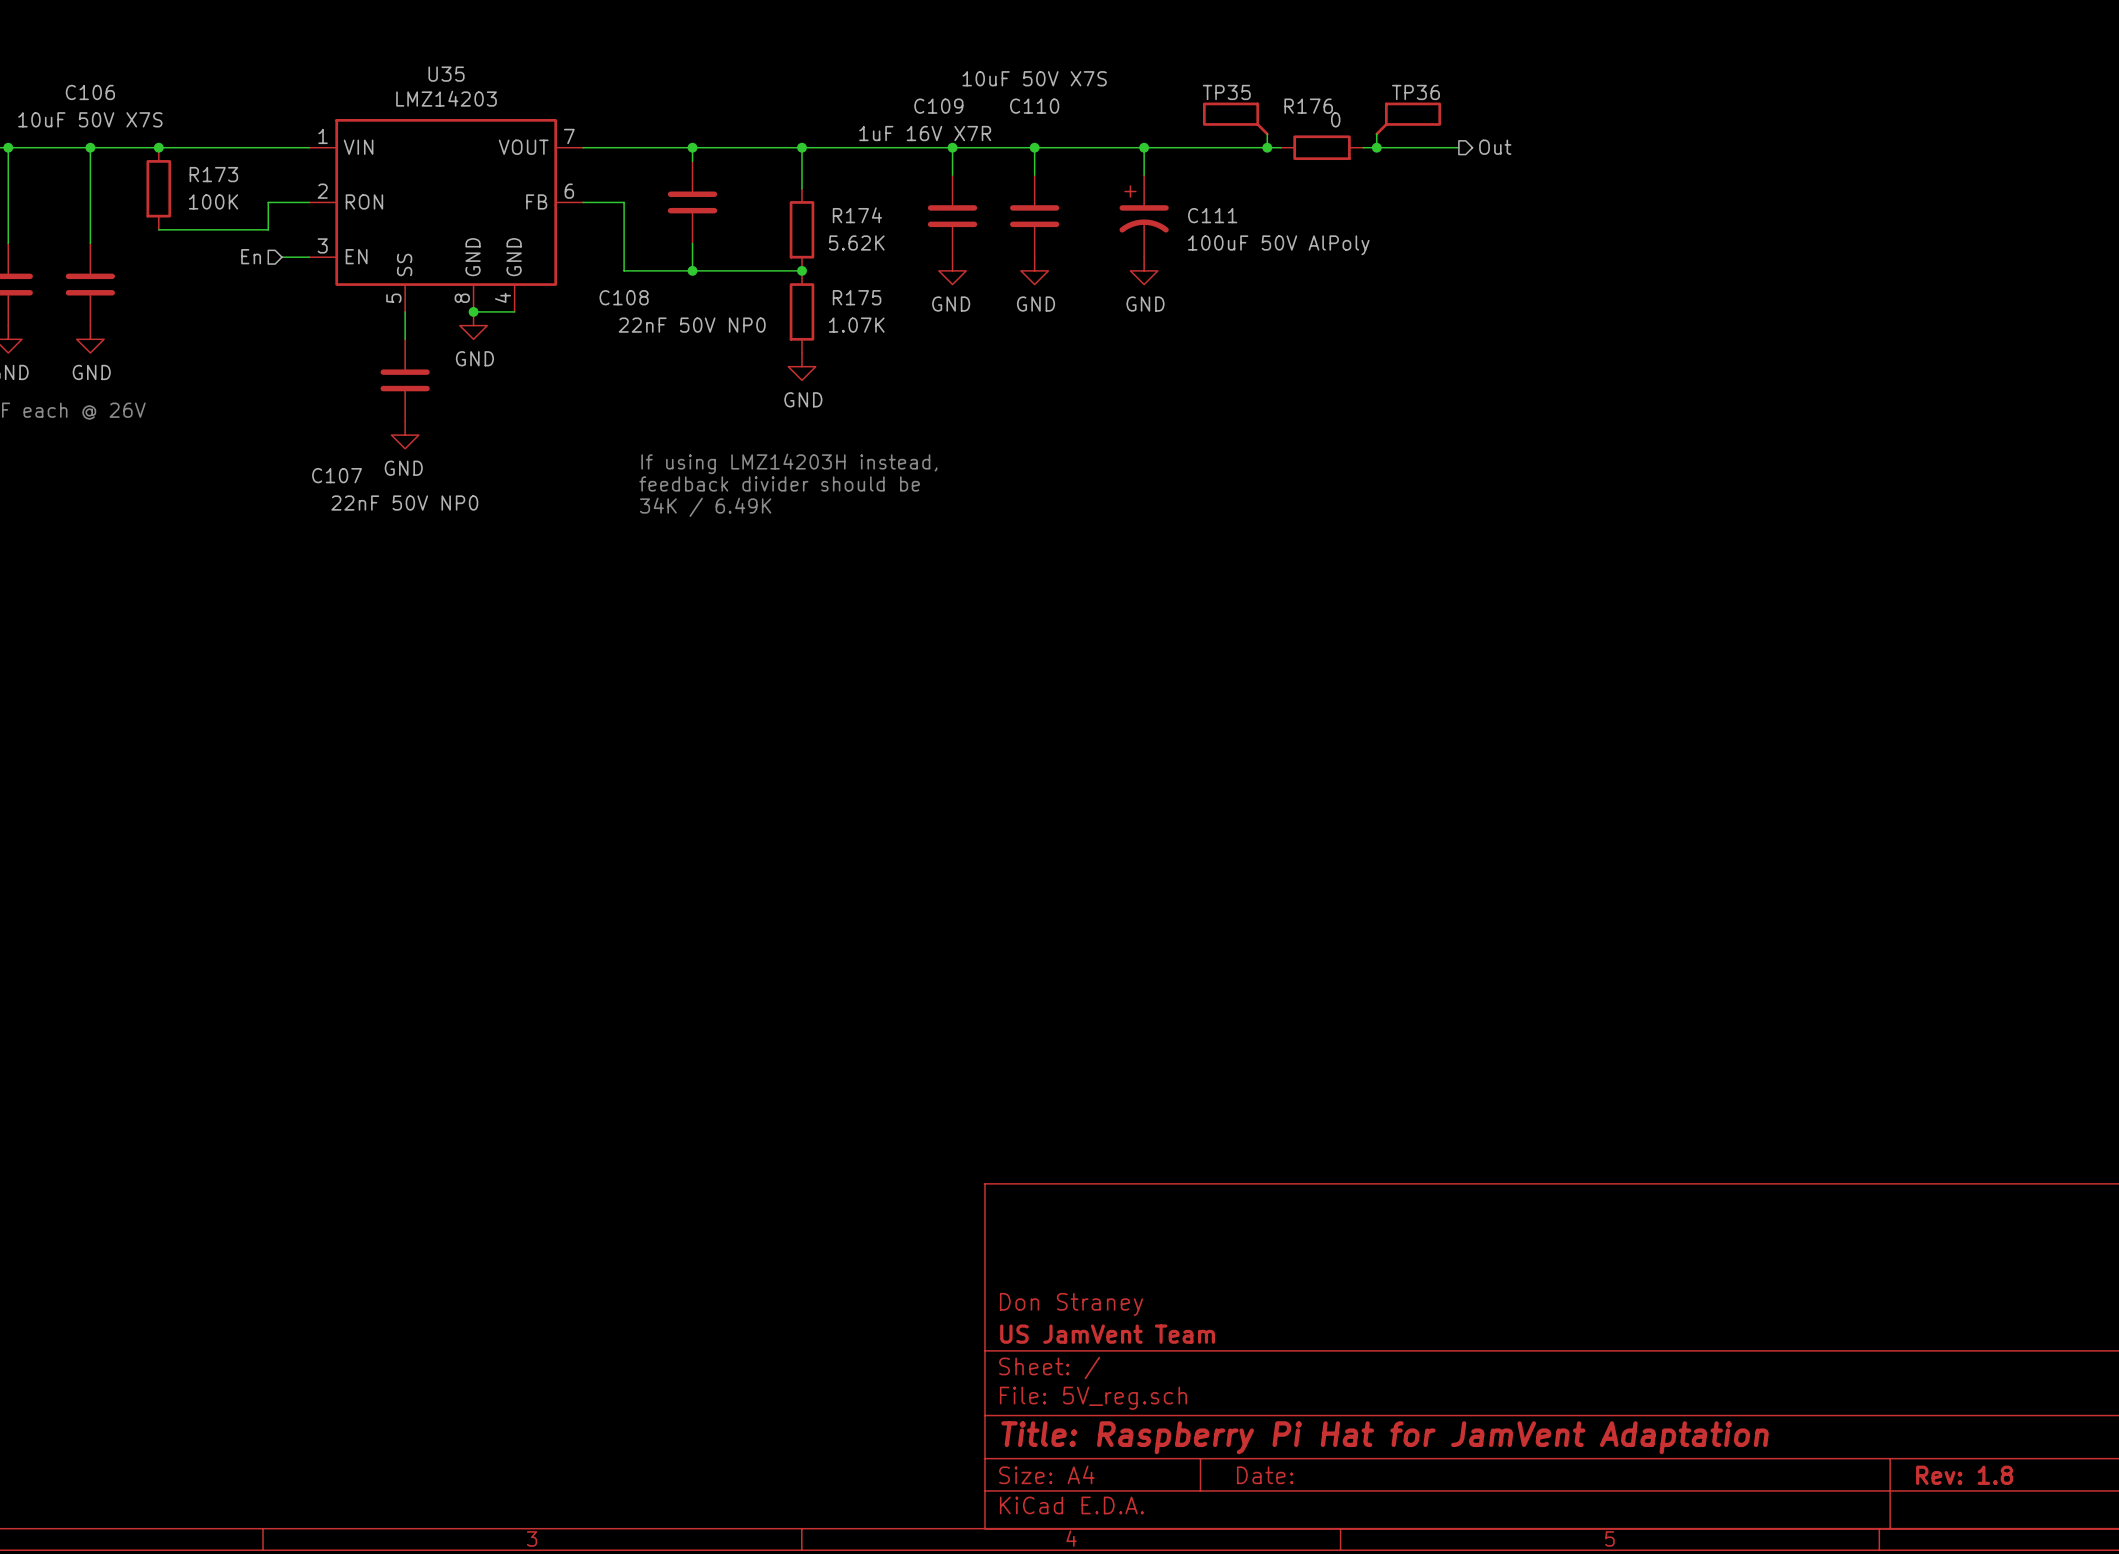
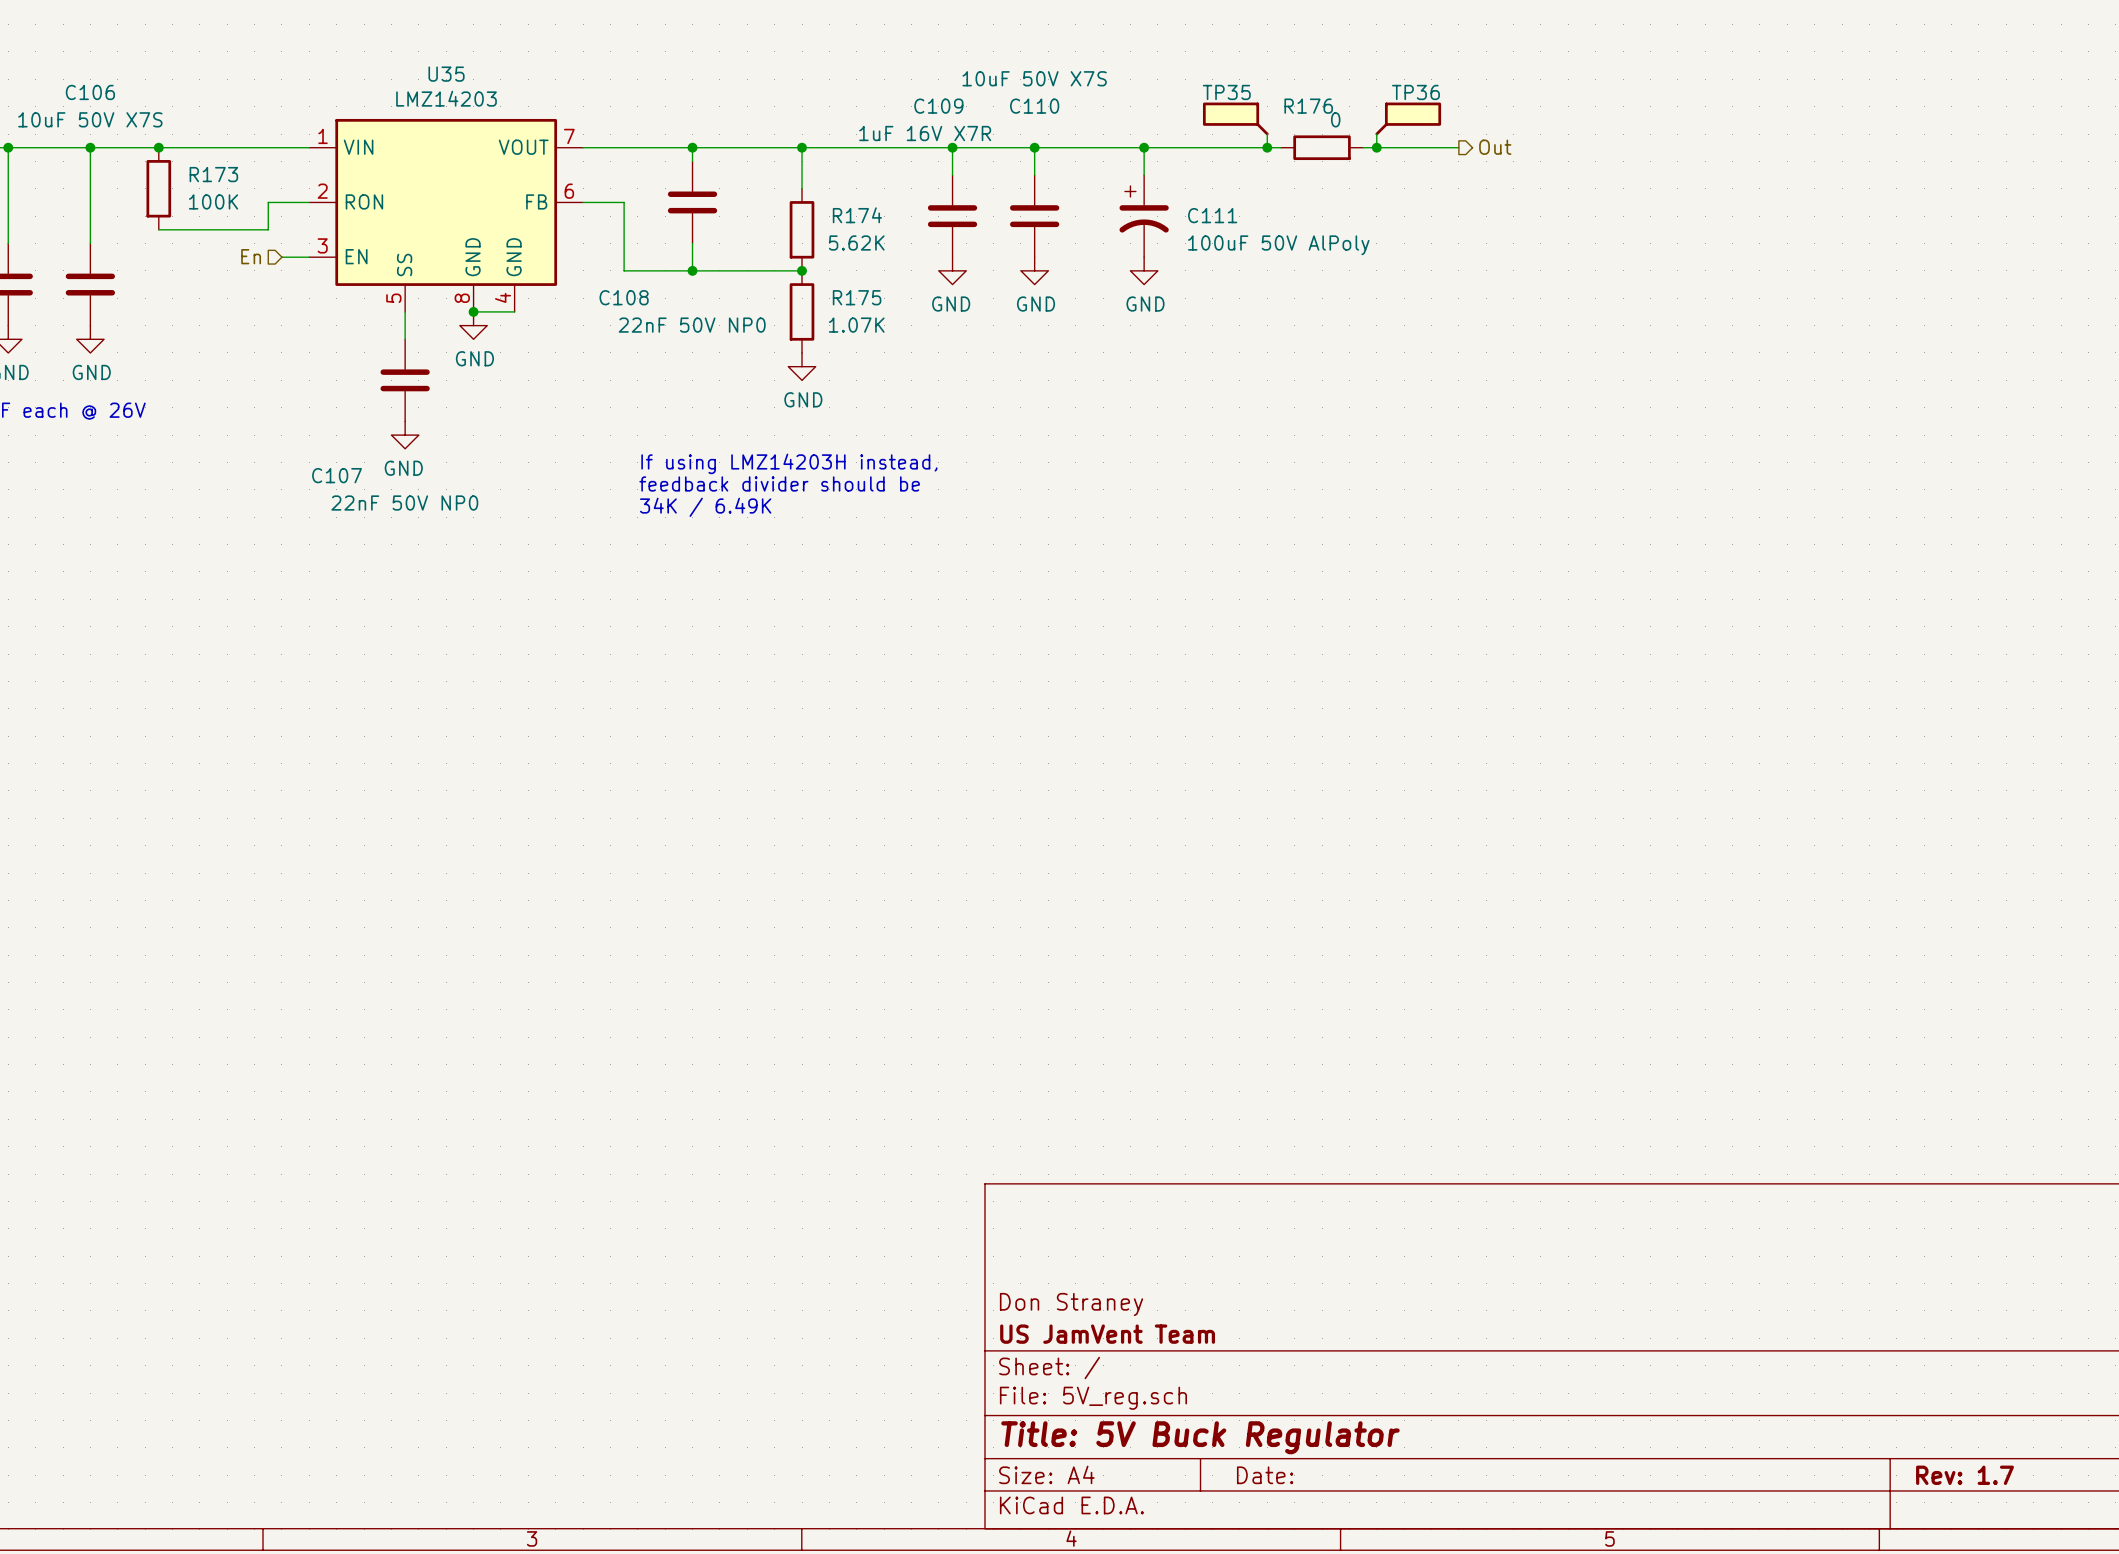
title block: Title: Raspberry Pi Hat for JamVent Adaptation (1384, 1437) -> Title: 5V Buck Regulator (1200, 1437)
title block: Rev: 1.8 (1964, 1475) -> Rev: 1.7 (1965, 1475)

